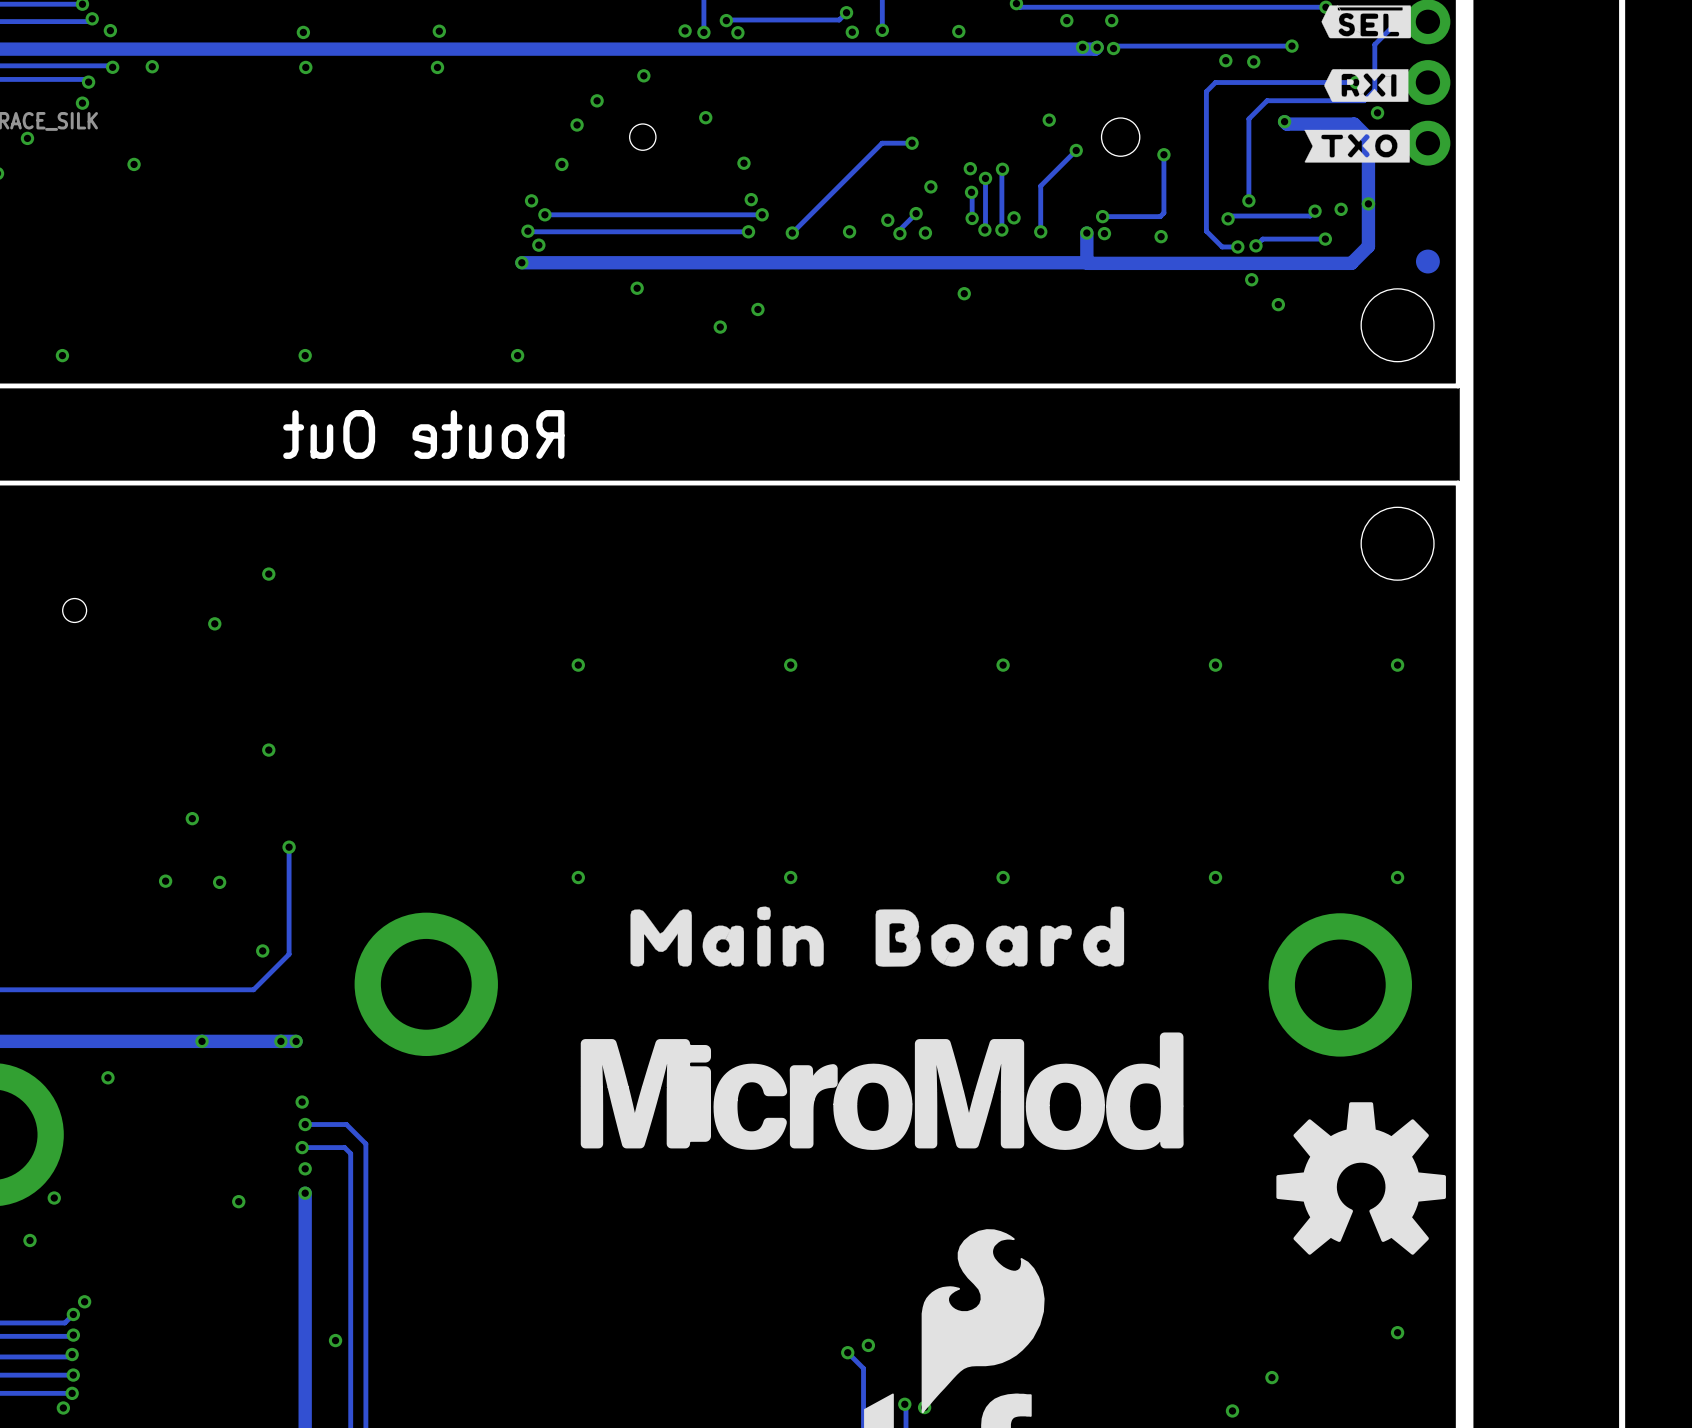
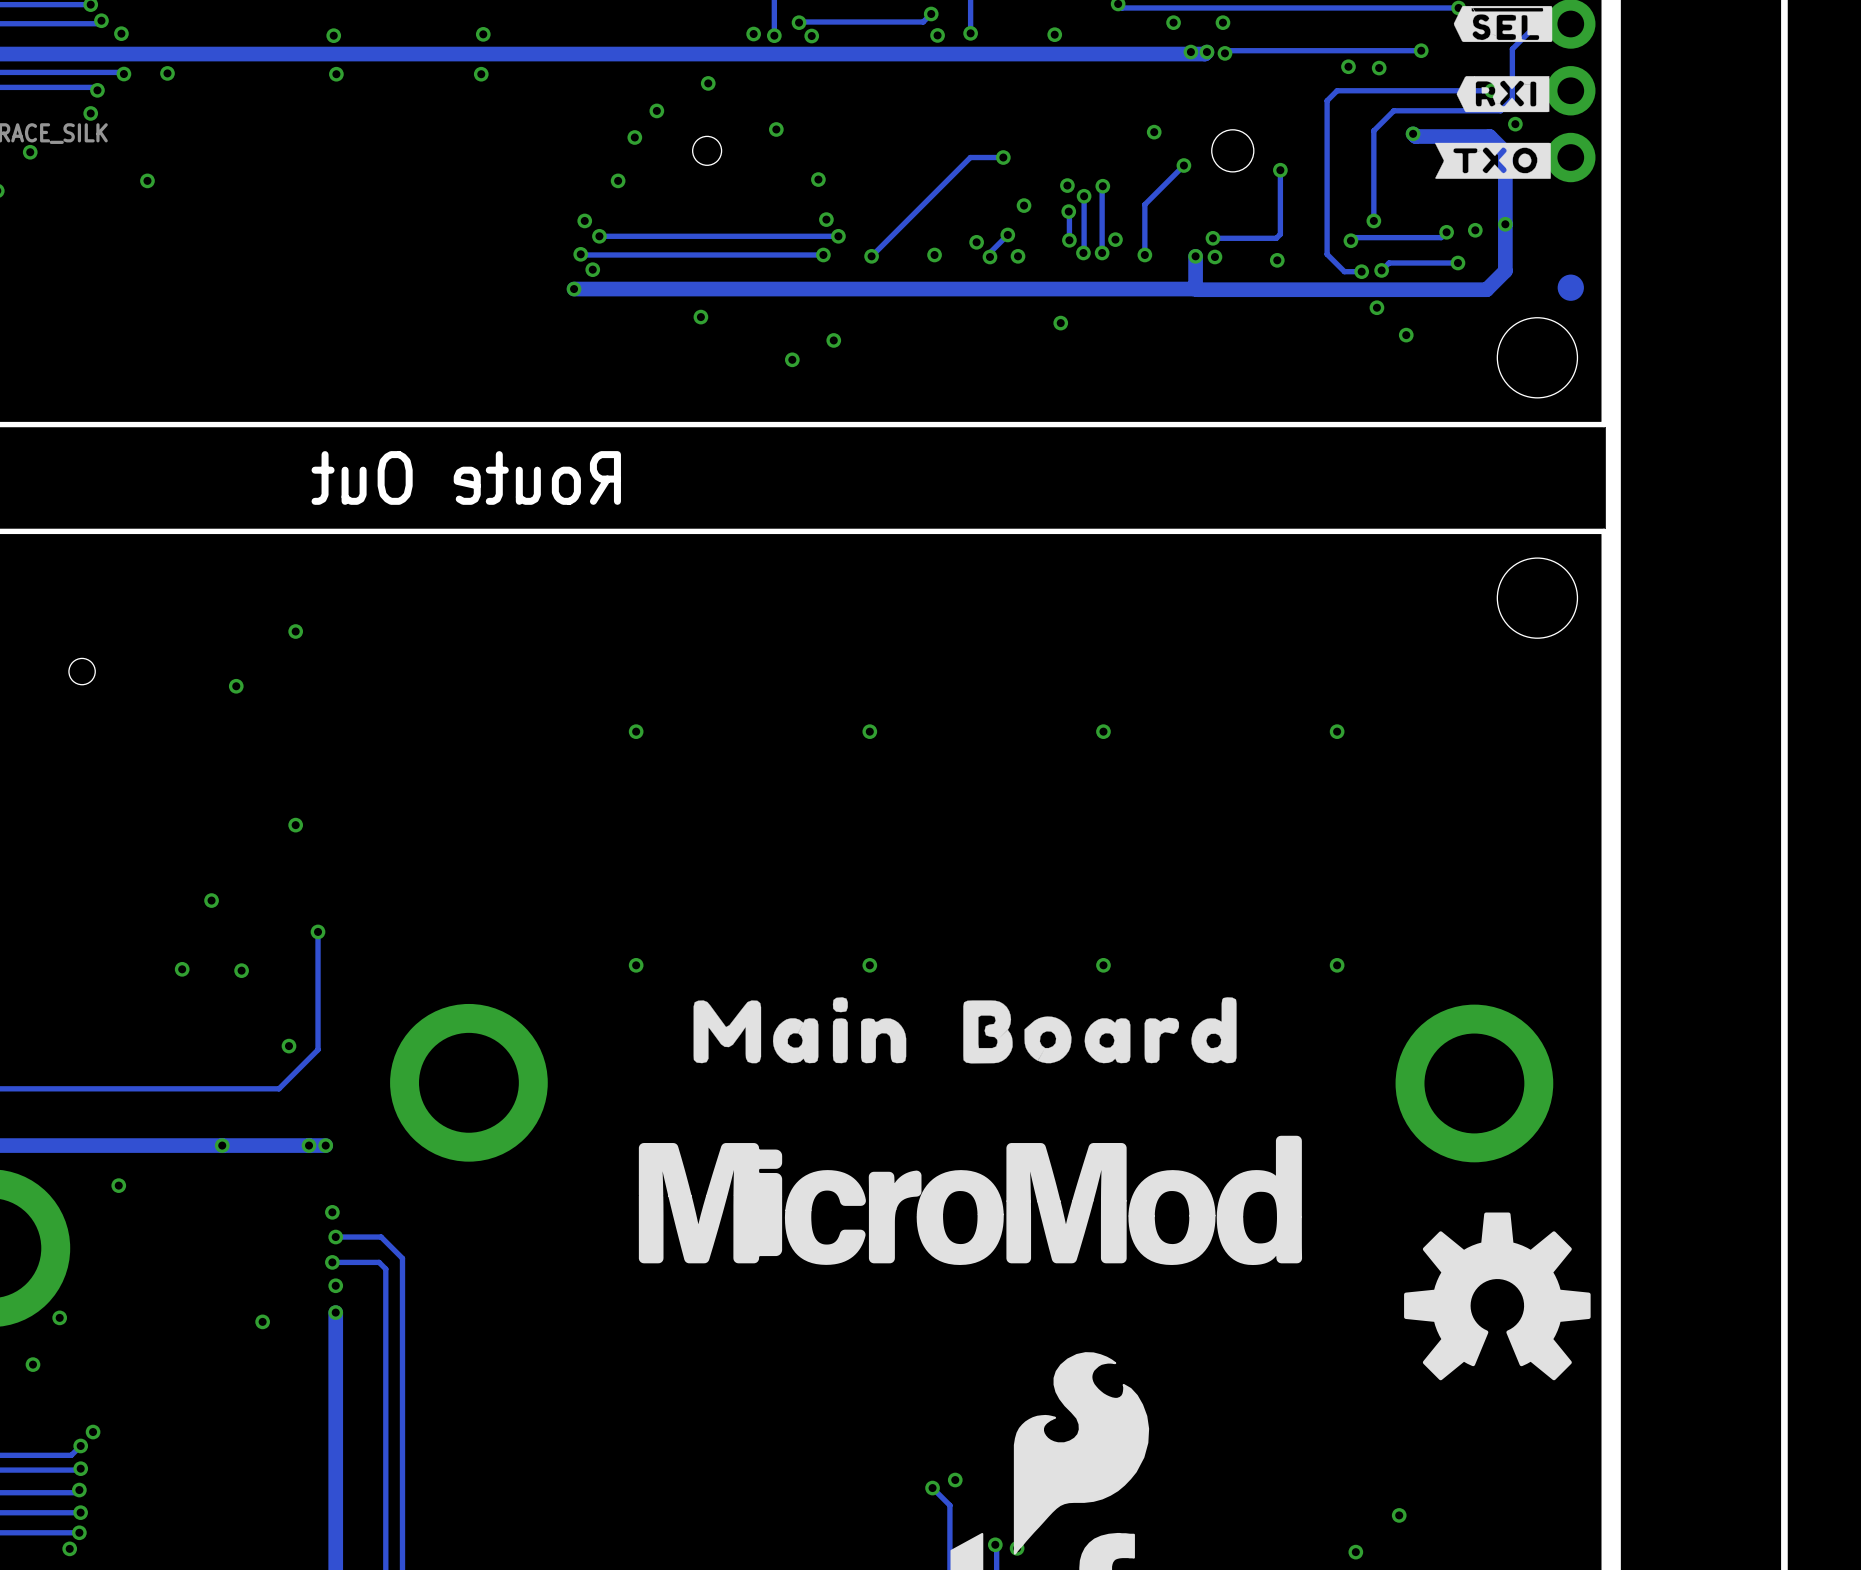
via: (62, 355) -> none
via: (305, 355) -> none
via: (517, 355) -> none
via: (1397, 665) -> none
via: (1397, 877) -> none
via: (1397, 1332) -> none
via: (335, 1340) -> none

